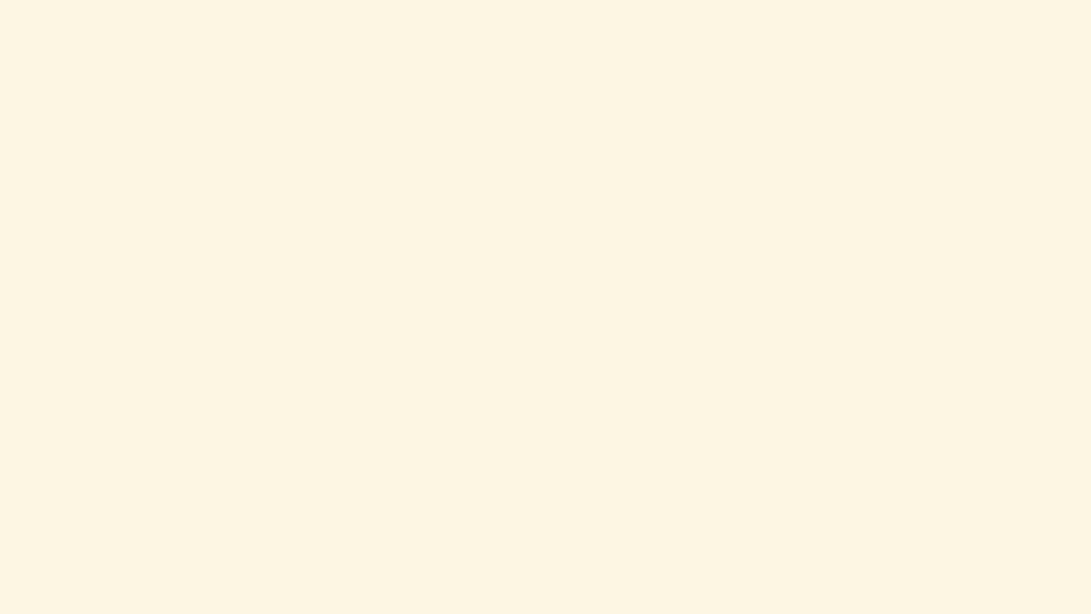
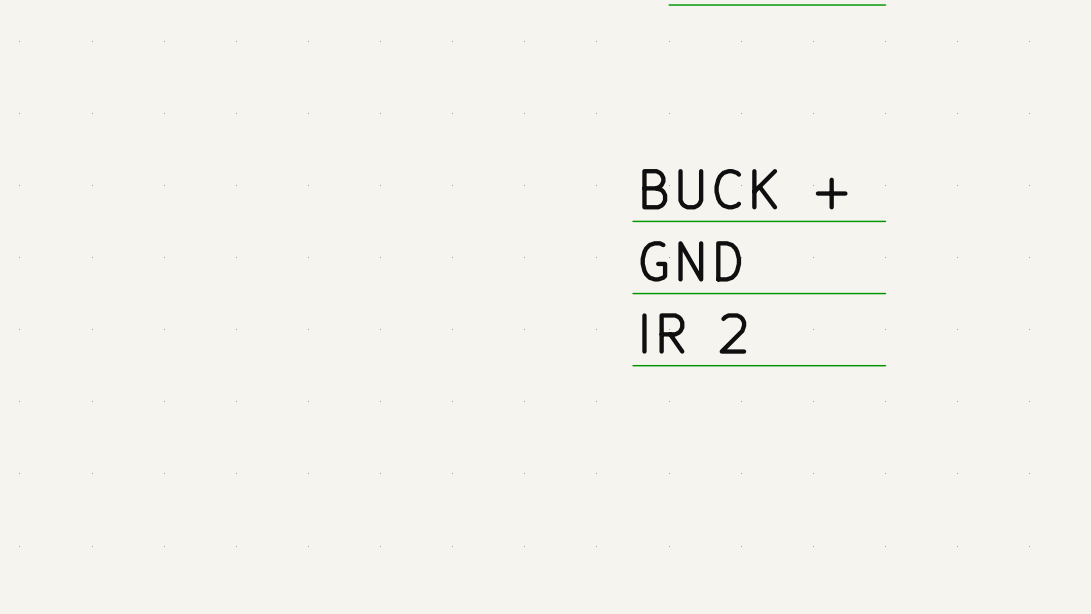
wire: none -> (669, 5) (885, 5)
label: none -> BUCK + (744, 189)
wire: none -> (633, 221) (885, 221)
label: none -> GND (690, 261)
wire: none -> (633, 293) (885, 293)
label: none -> IR 2 (694, 333)
wire: none -> (633, 365) (885, 365)

